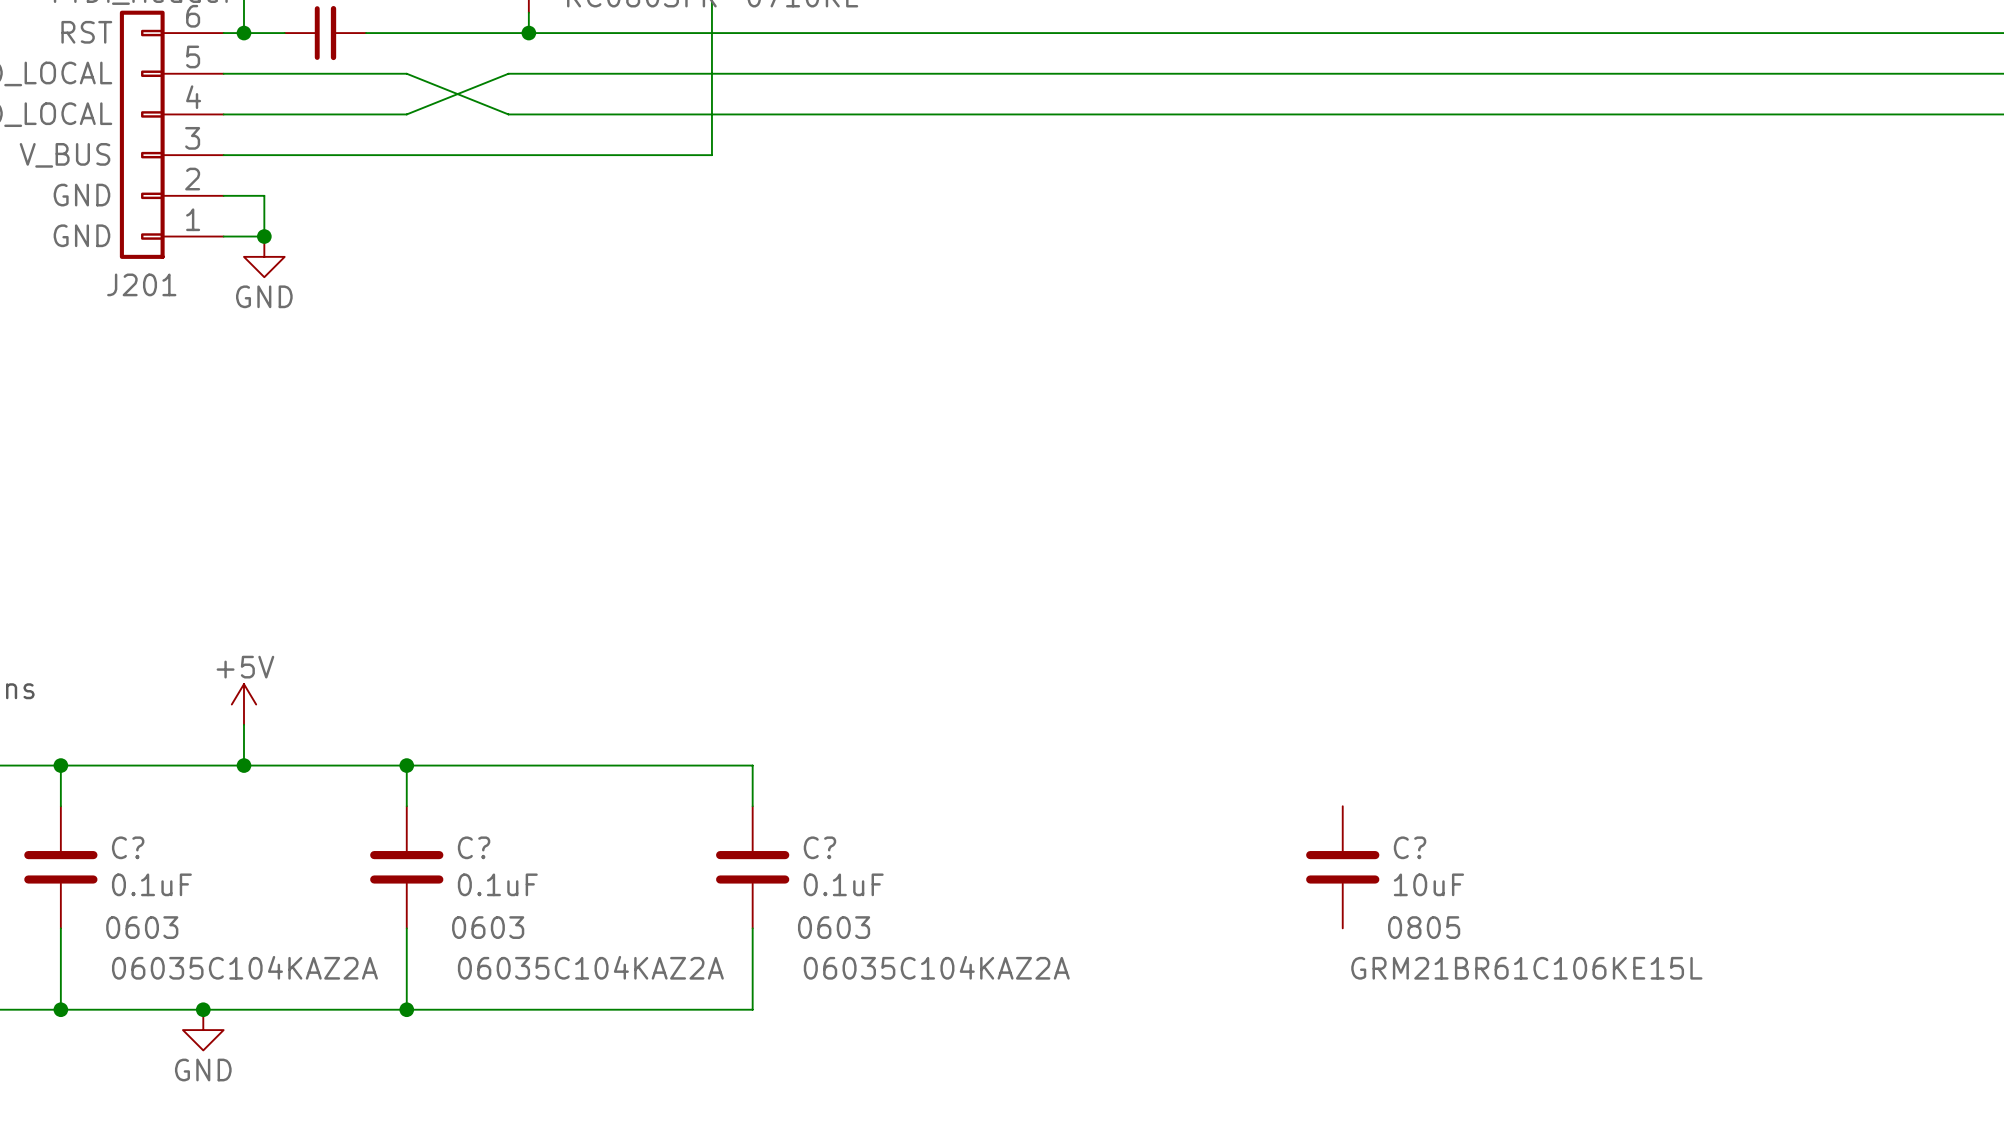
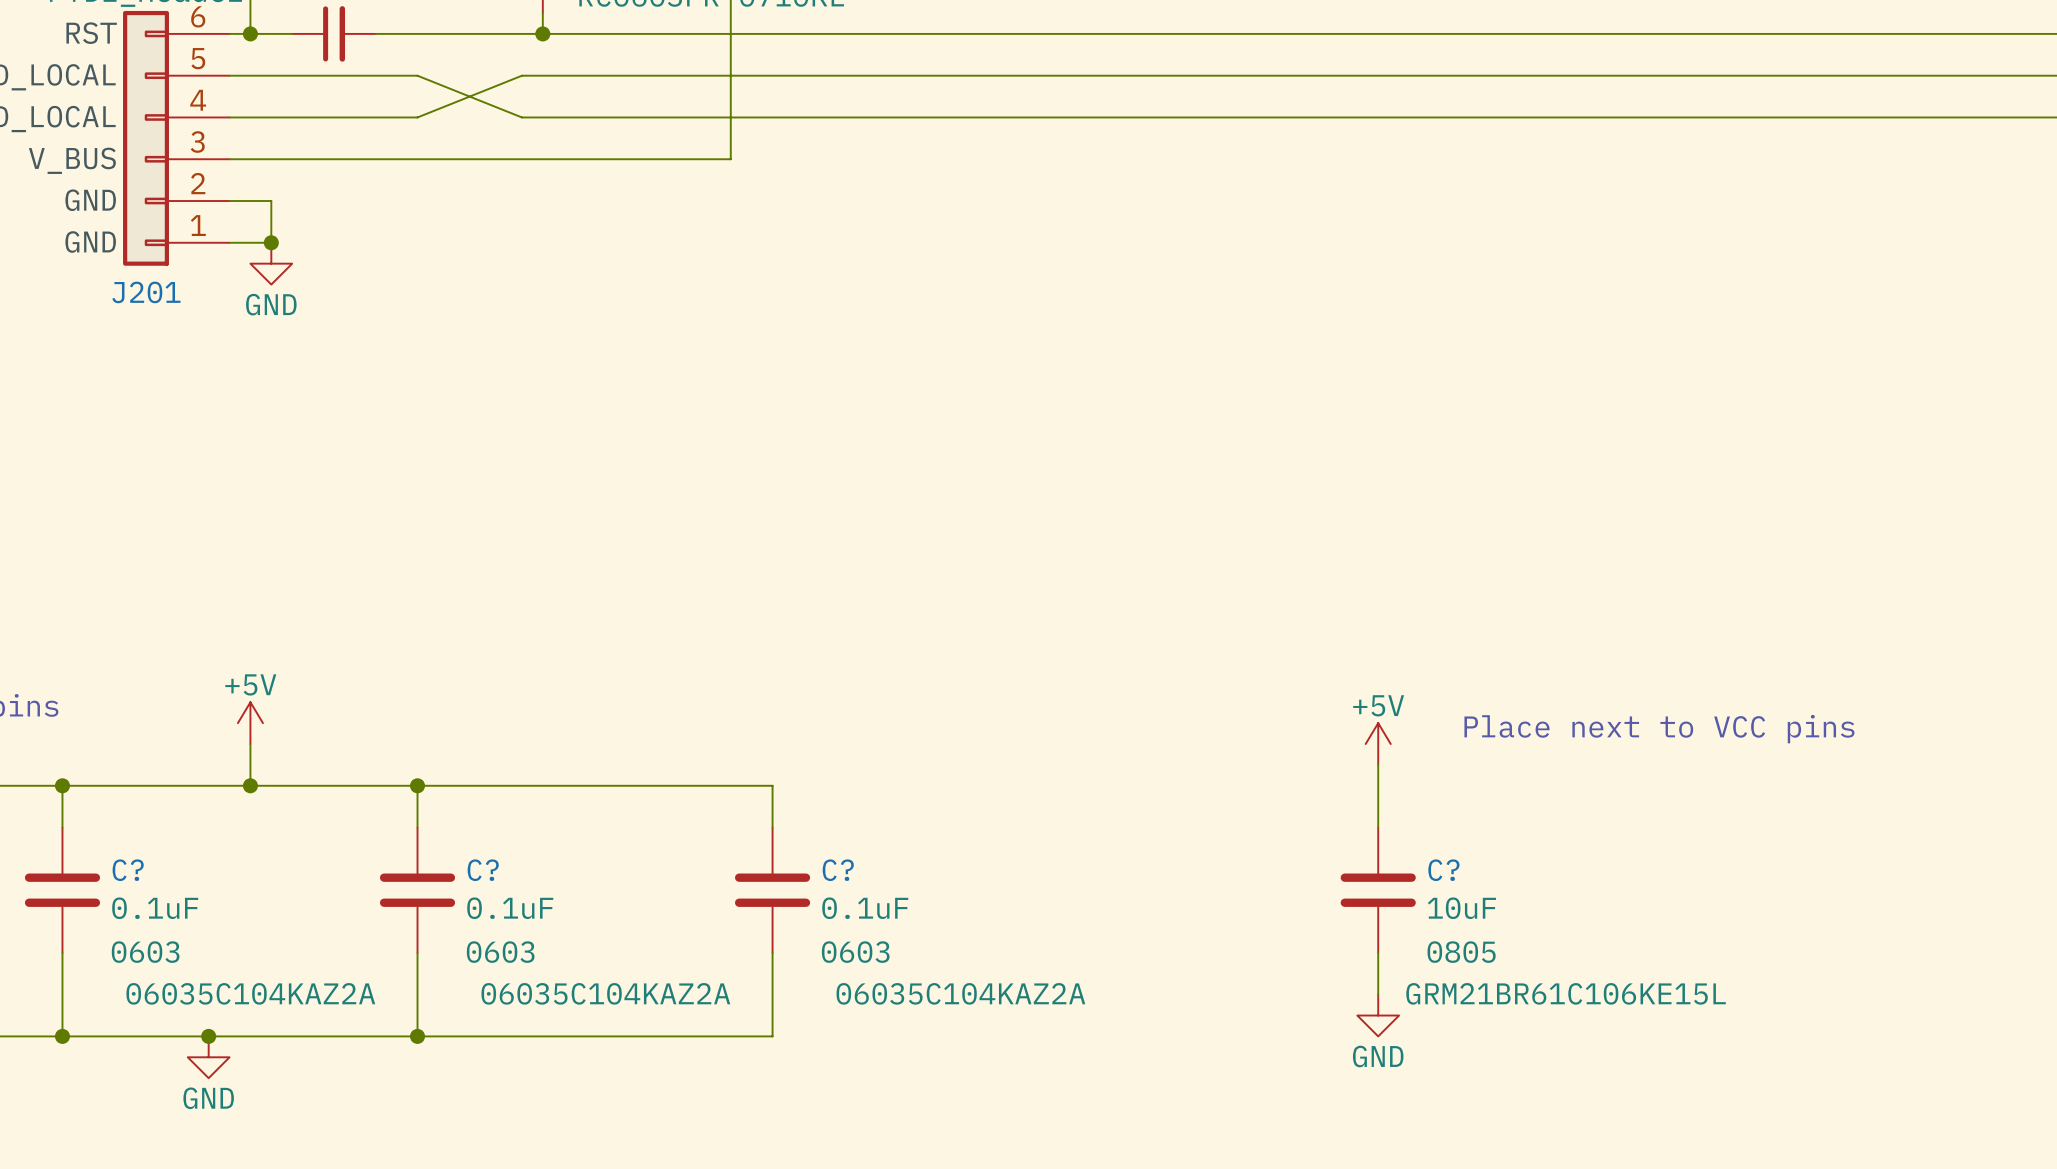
text: none -> Place next to VCC pins (1659, 729)
power symbol: none -> +5V (1378, 744)
wire: none -> (1378, 764) (1378, 827)
wire: none -> (1378, 952) (1378, 994)
power symbol: none -> GND (1378, 1015)

